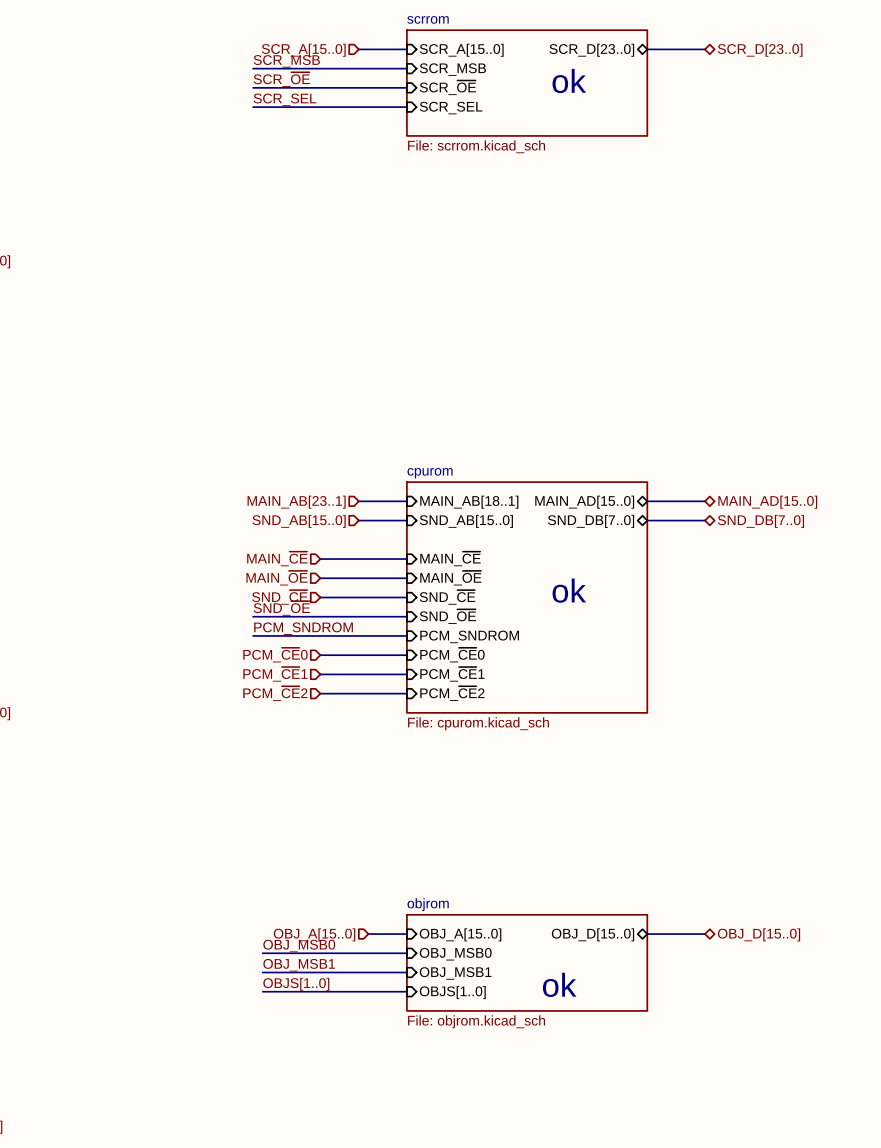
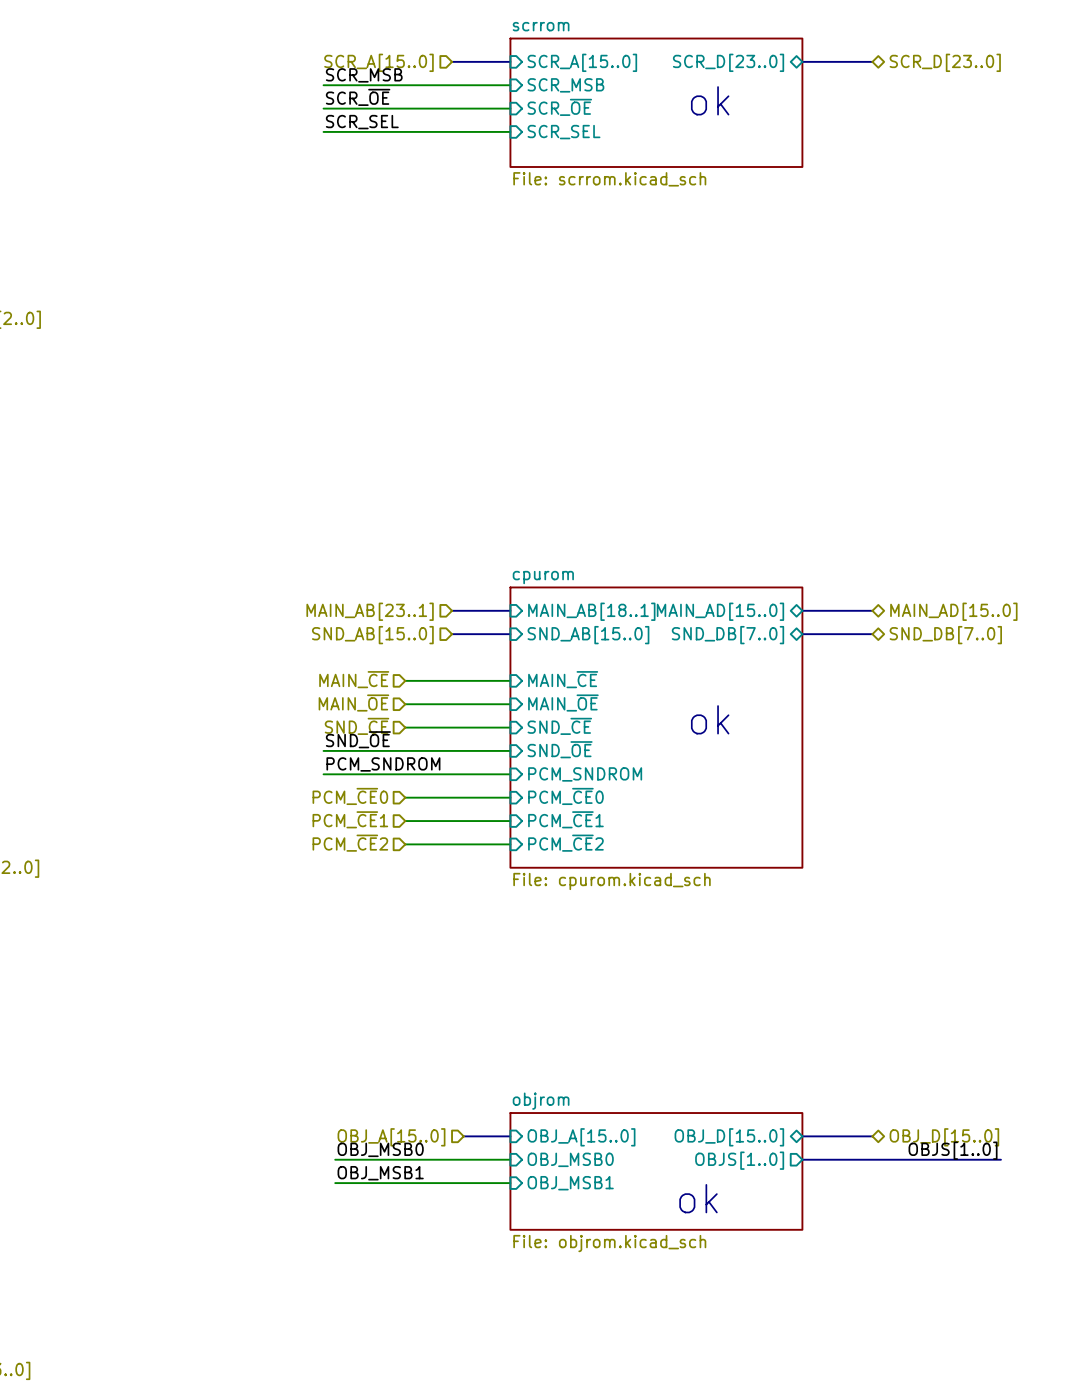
label: none -> OBJS[1..0] (953, 1150)
bus: none -> (802, 1159) (1000, 1159)
sheet pin: none -> OBJS[1..0] (739, 1160)
label: OBJS[1..0] (296, 984) -> none
bus: (262, 991) (406, 991) -> none
sheet pin: OBJS[1..0] (452, 992) -> none

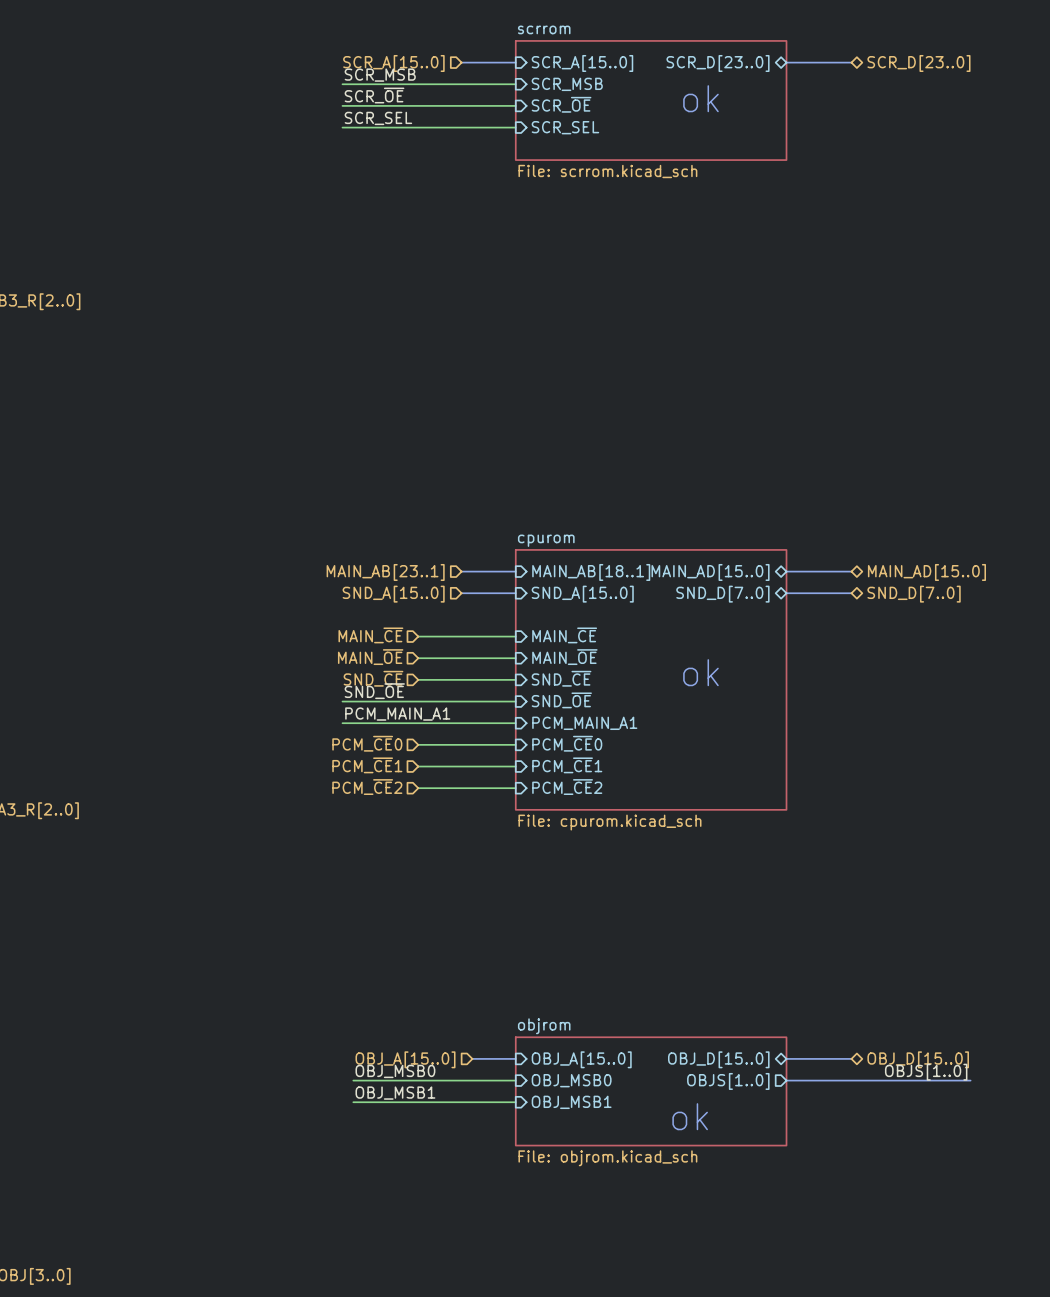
hierarchical label: SND_AB[15..0] (372, 635) -> SND_A[15..0] (393, 594)
sheet pin: SND_AB[15..0] (588, 635) -> SND_A[15..0] (582, 594)
sheet pin: SND_DB[7..0] (727, 635) -> SND_D[7..0] (722, 594)
hierarchical label: SND_DB[7..0] (945, 635) -> SND_D[7..0] (914, 594)
label: PCM_SNDROM (383, 764) -> PCM_MAIN_A1 (397, 714)
sheet pin: PCM_SNDROM (585, 774) -> PCM_MAIN_A1 (584, 723)

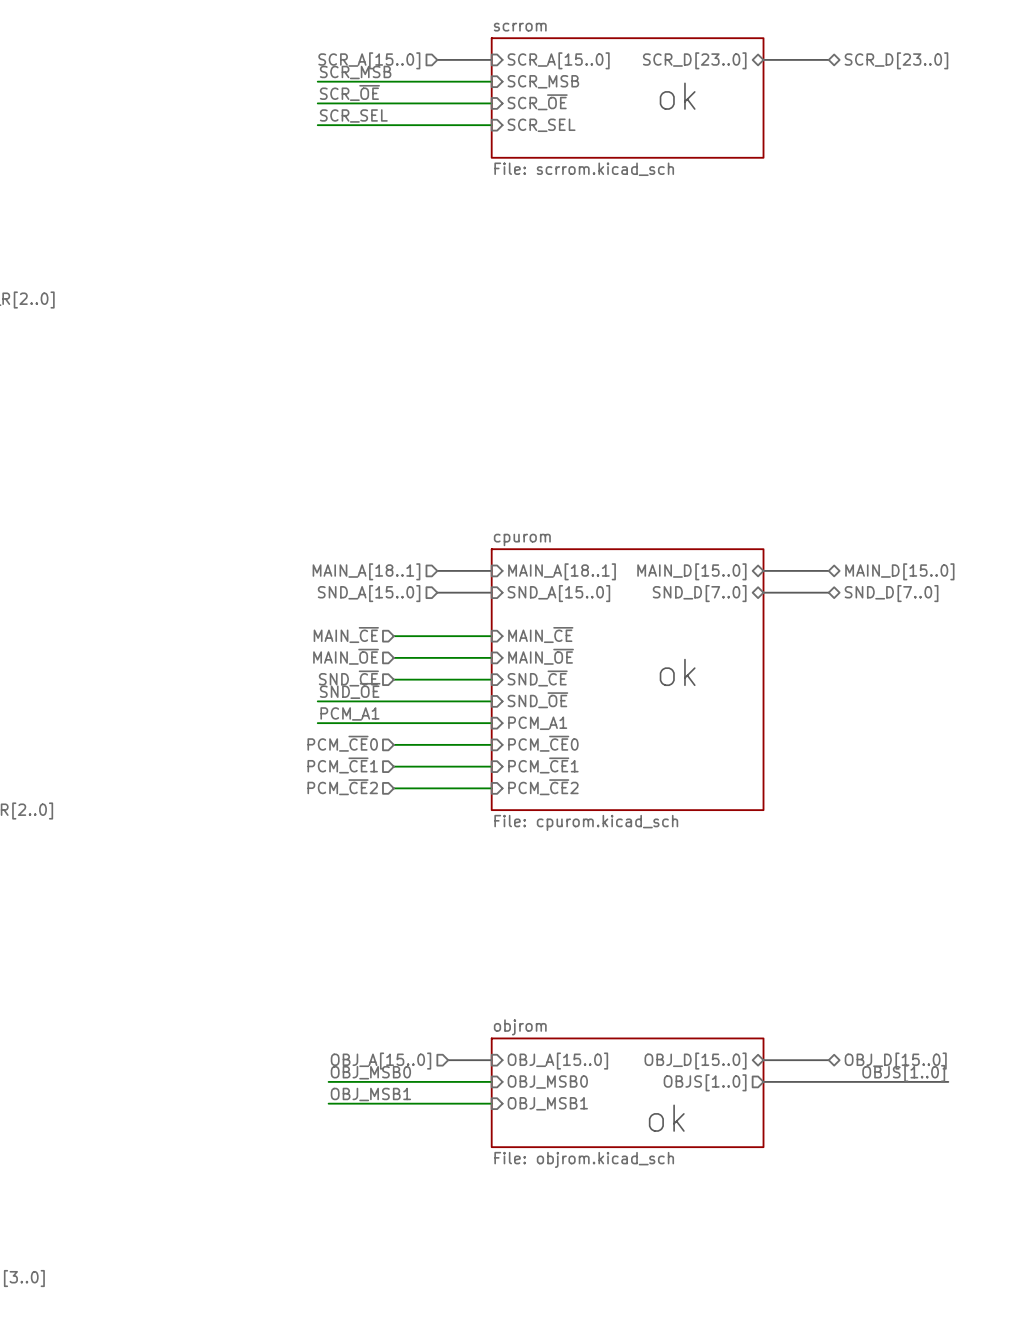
hierarchical label: MAIN_AB[23..1] (385, 572) -> MAIN_A[18..1] (366, 571)
sheet pin: MAIN_AB[18..1] (591, 572) -> MAIN_A[18..1] (562, 571)
sheet pin: MAIN_AD[15..0] (710, 572) -> MAIN_D[15..0] (691, 571)
hierarchical label: MAIN_AD[15..0] (926, 572) -> MAIN_D[15..0] (899, 571)
label: PCM_MAIN_A1 (397, 714) -> PCM_A1 (349, 713)
sheet pin: PCM_MAIN_A1 (584, 723) -> PCM_A1 (537, 723)

